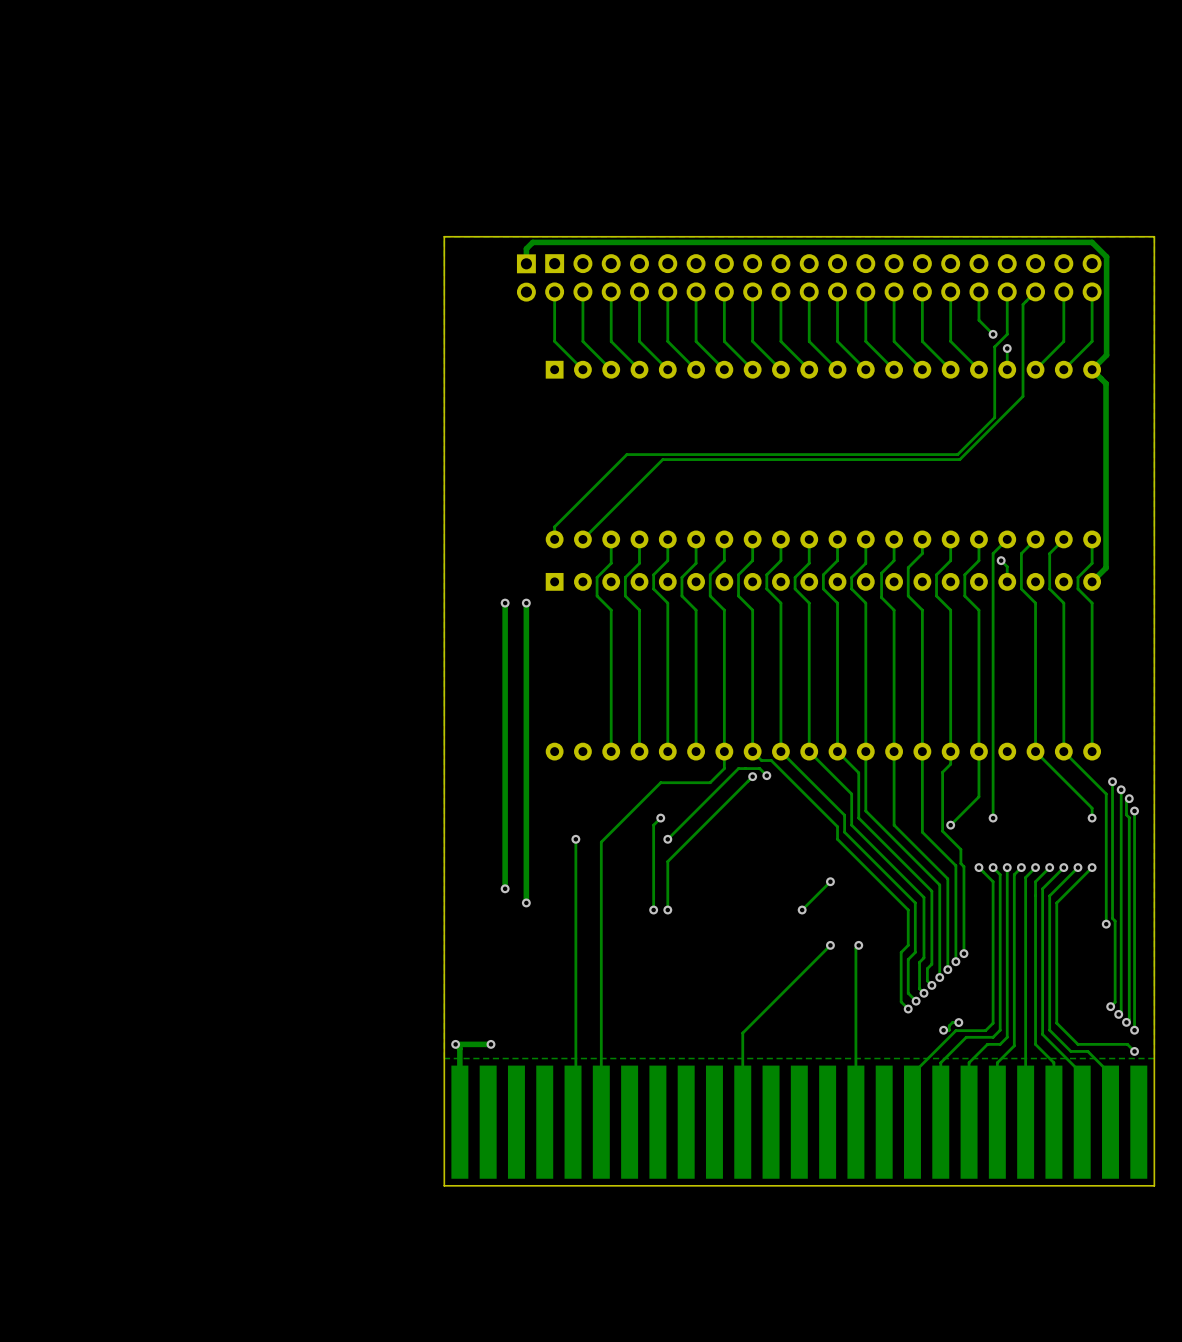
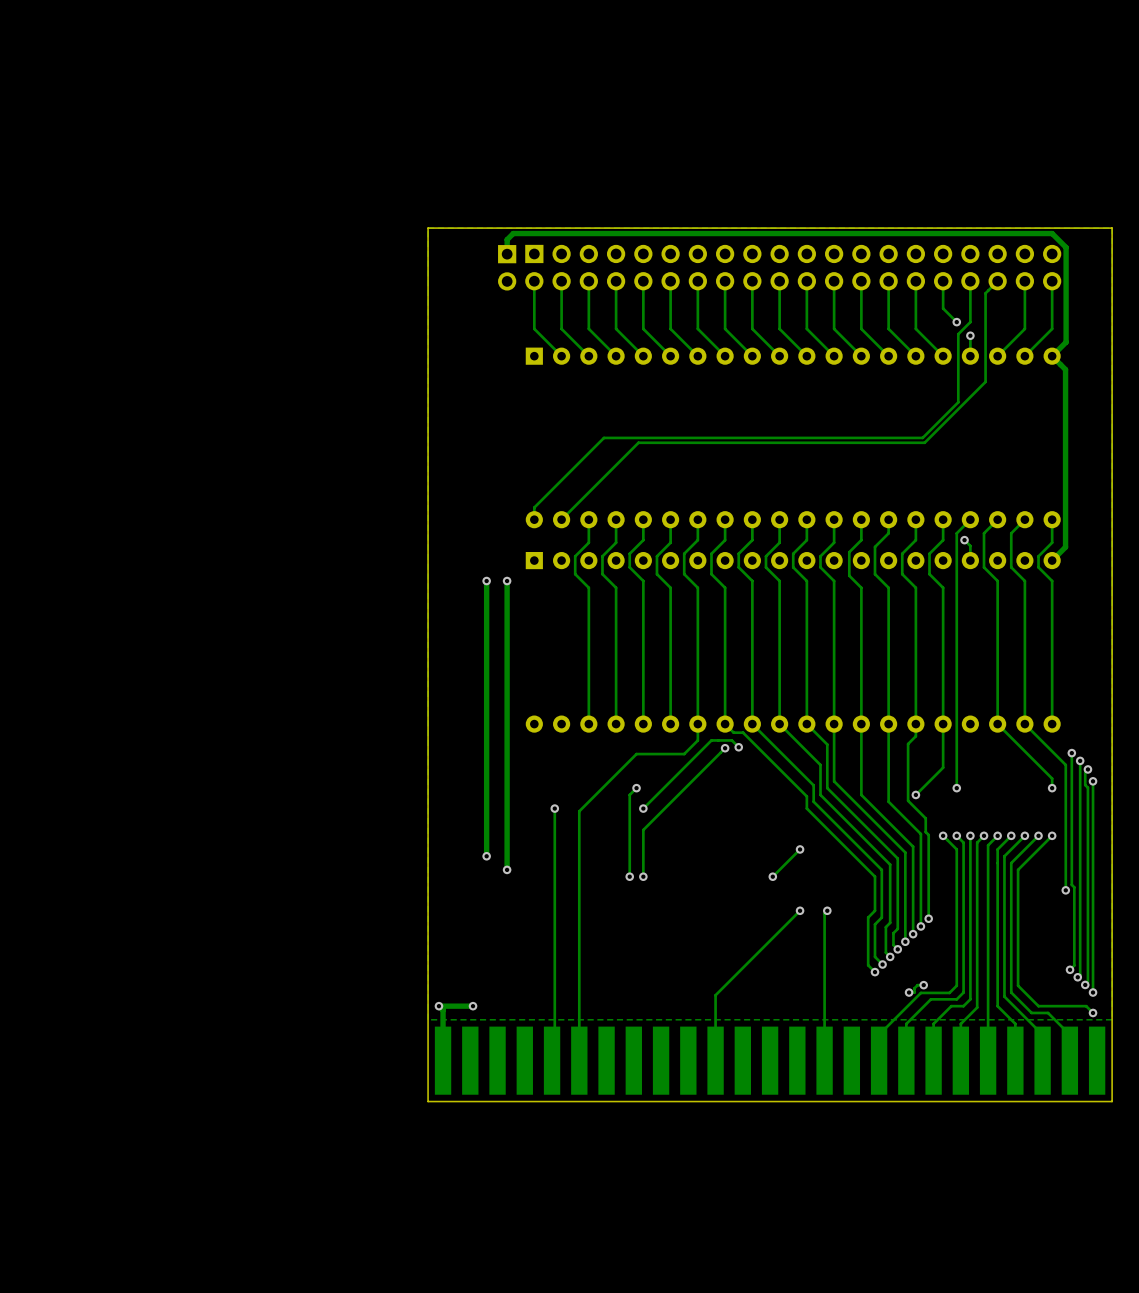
part: none -> (770, 1060)
part: (799, 1122) -> none
board edge: (1154, 1143) (1154, 1185) (444, 1185) (444, 1143) -> (1112, 1101) (428, 1101)

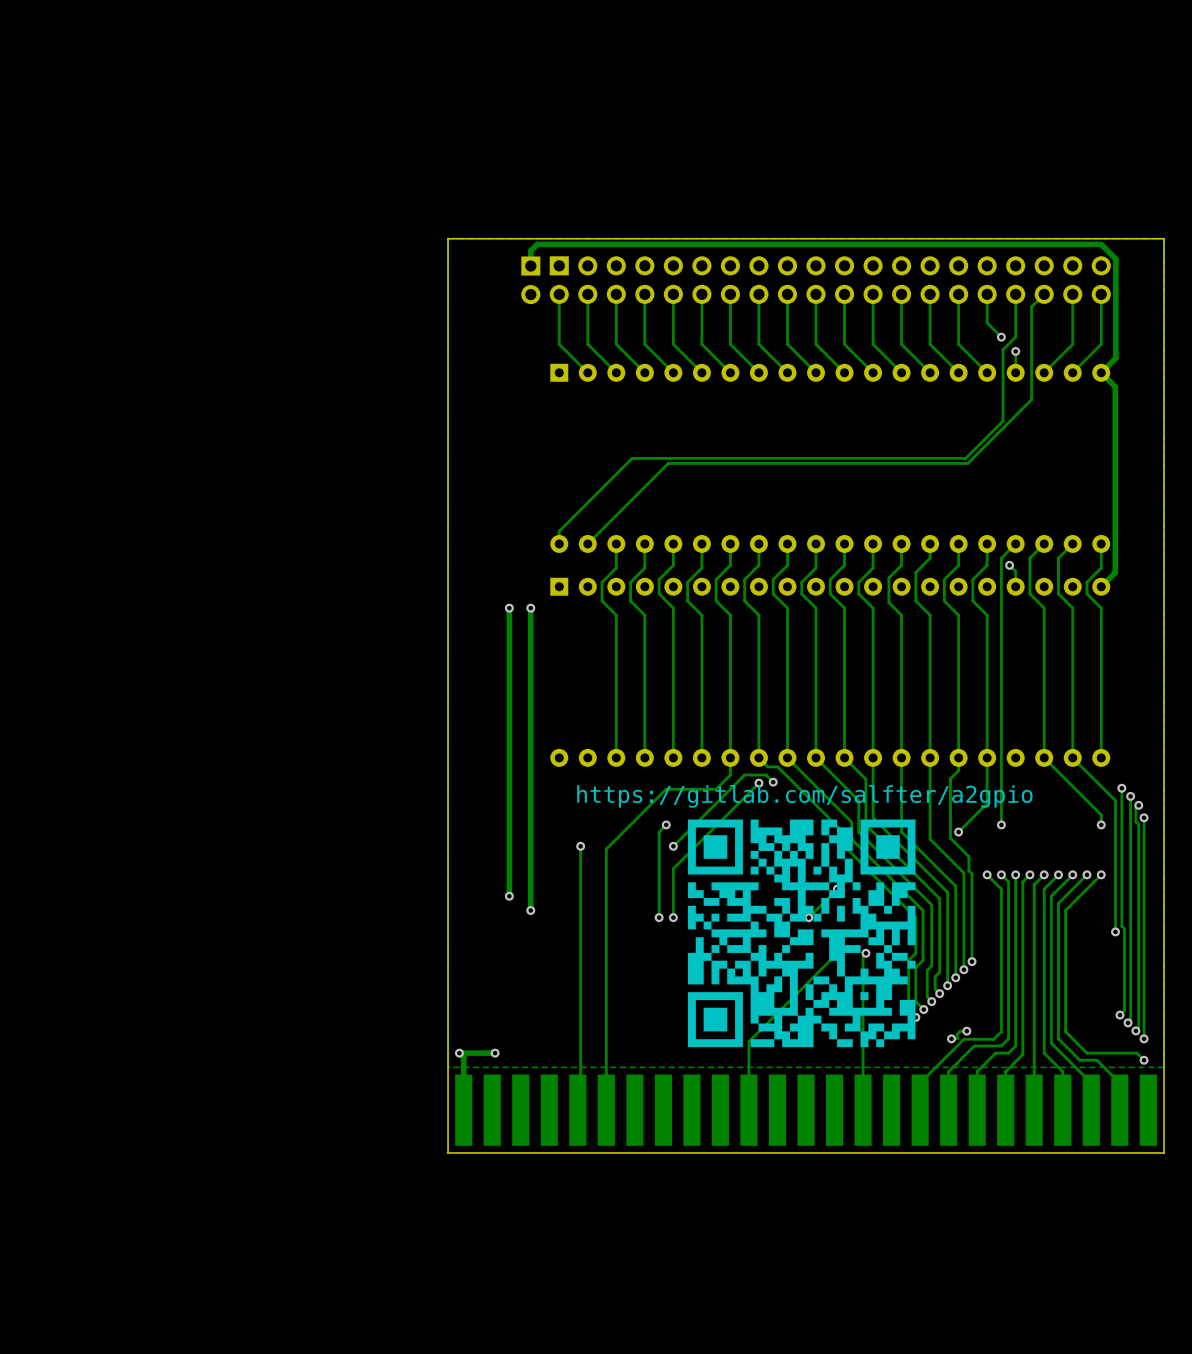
text: none -> https://gitlab.com/salfter/a2gpio (804, 796)
drawing: none -> [687, 819, 916, 1048]

